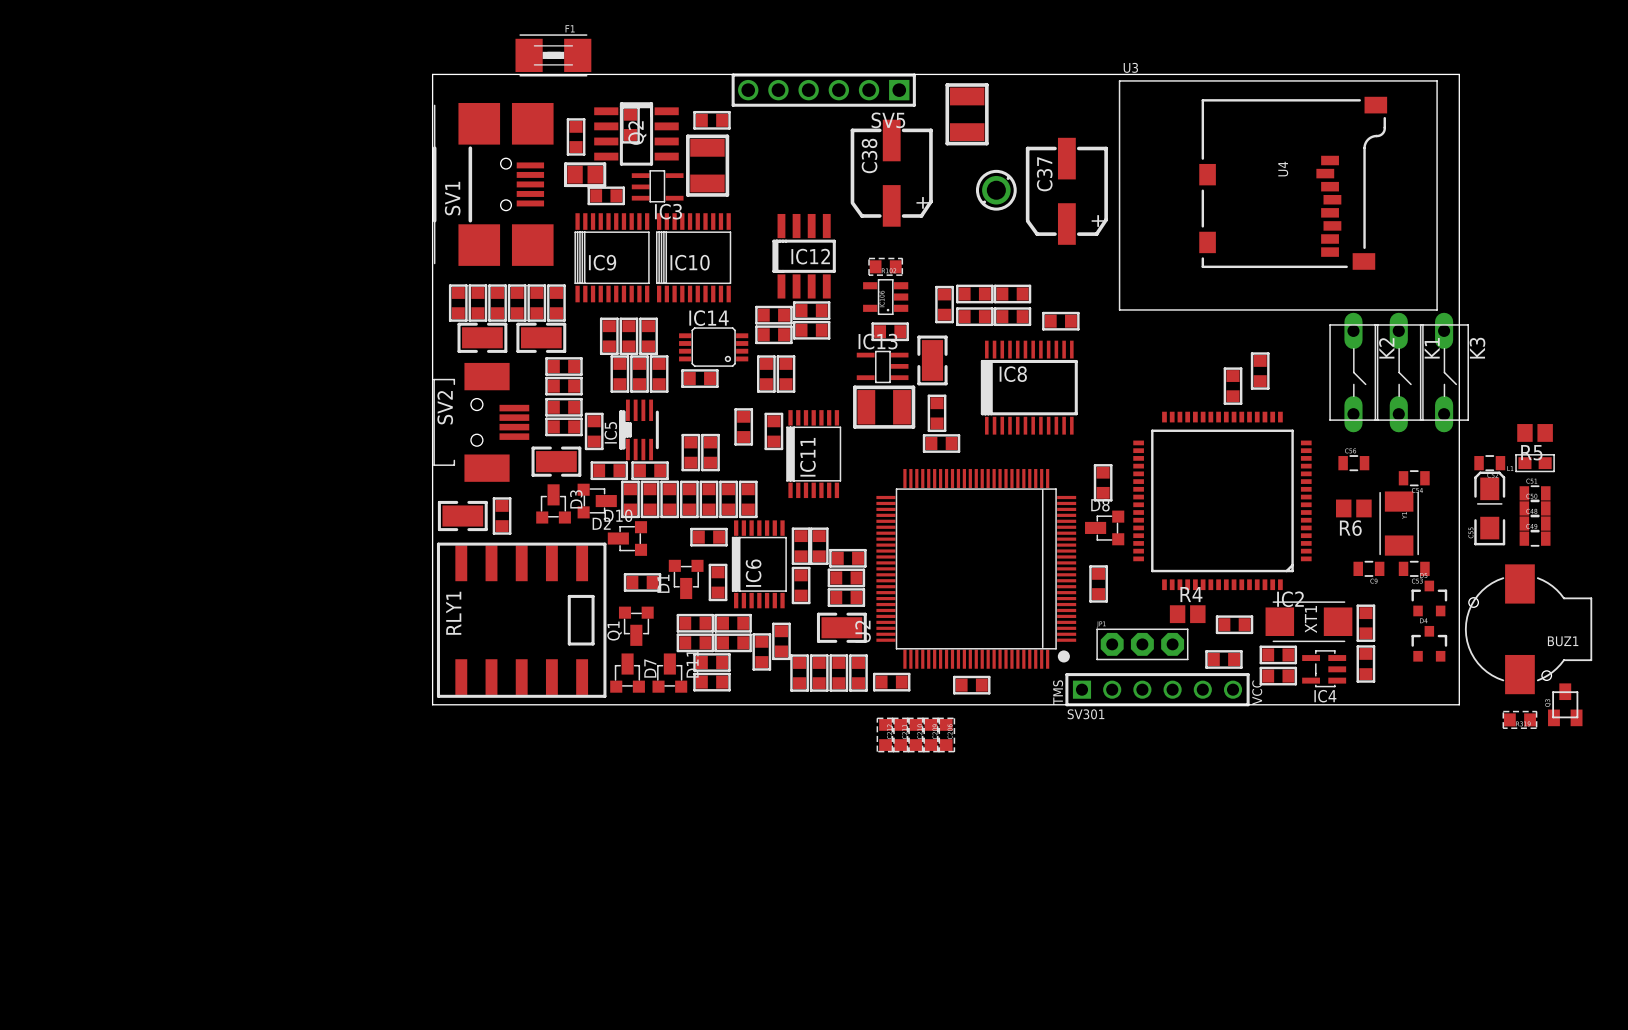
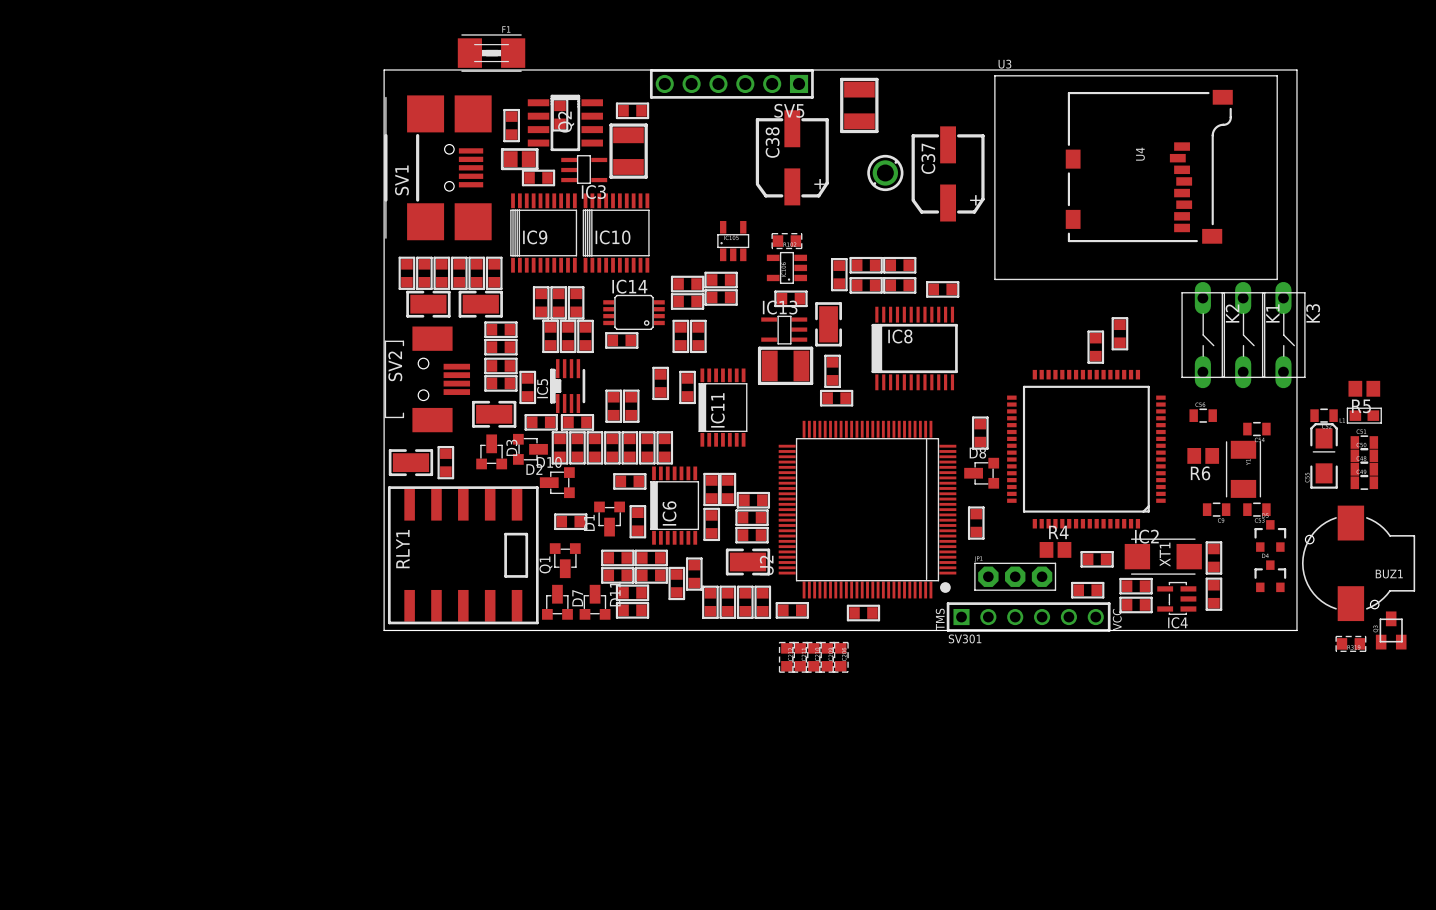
IC12: (804, 256) -> none
part: none -> (733, 241)

